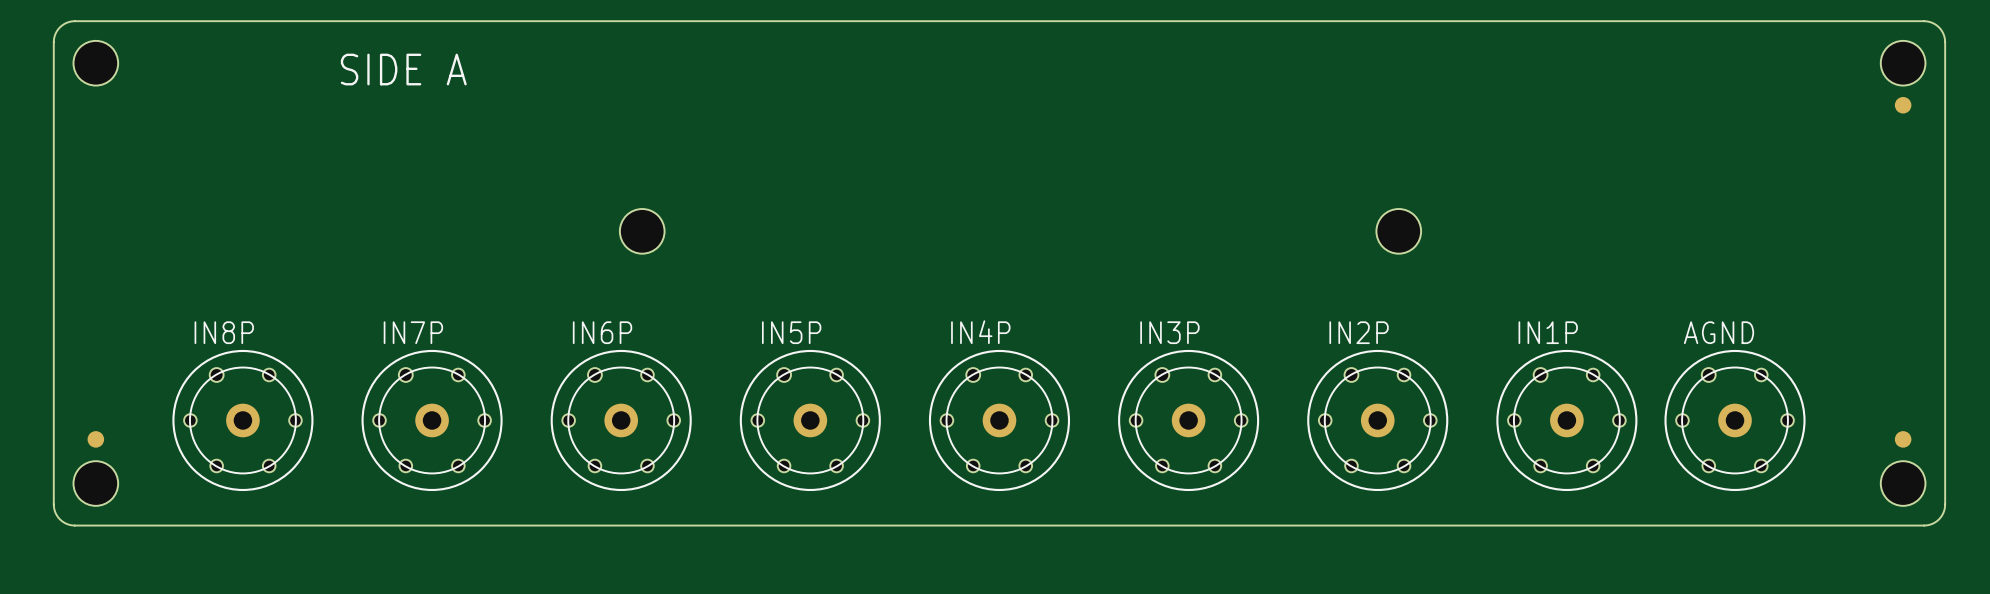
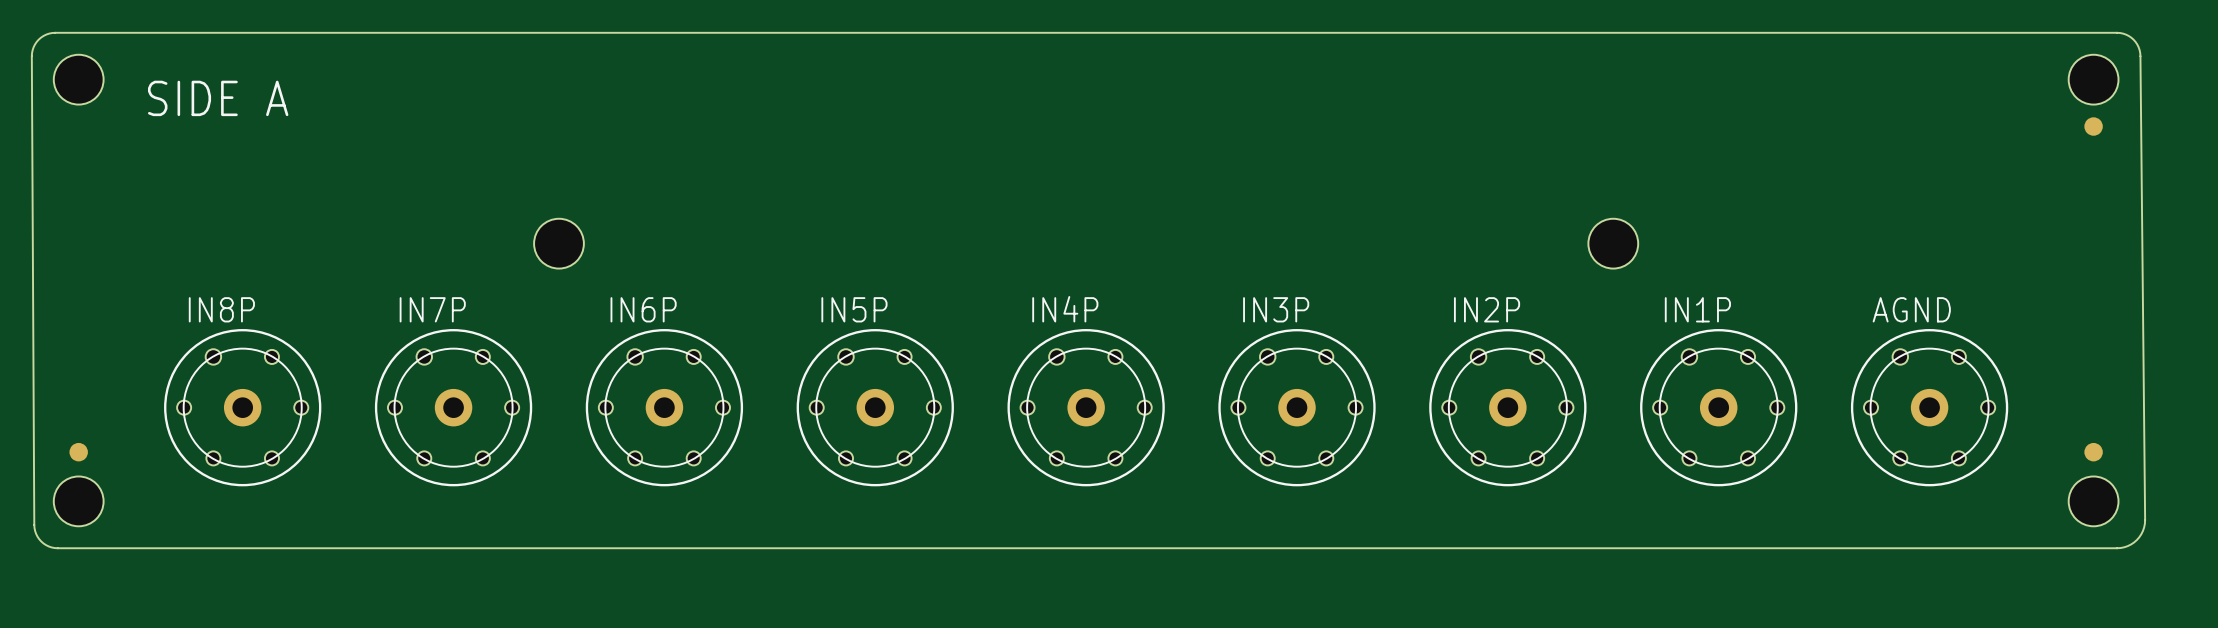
board edge: (1945, 42) (1945, 504) (1943, 512) (1939, 519) (1932, 523) (1924, 525) (69, 524) (58, 517) (53, 504) (53, 42) -> (2140, 56) (2145, 520) (2142, 530) (2136, 540) (2127, 546) (2117, 548) (51, 547) (39, 539) (34, 524) (31, 56)
text position: SIDE A (403, 69) -> SIDE A (218, 98)
hole position: (642, 231) -> (558, 243)
hole position: (1398, 231) -> (1613, 243)
IN8P position: (242, 420) -> (242, 407)
IN7P position: (432, 420) -> (453, 407)
IN6P position: (621, 420) -> (664, 407)
IN5P position: (810, 420) -> (875, 407)
IN4P position: (999, 420) -> (1086, 407)
IN3P position: (1188, 420) -> (1297, 407)
IN2P position: (1377, 420) -> (1507, 407)
IN1P position: (1566, 420) -> (1718, 407)
AGND position: (1735, 420) -> (1929, 407)
part position: (95, 439) -> (78, 452)
part position: (1903, 439) -> (2093, 452)
hole position: (95, 483) -> (78, 501)
hole position: (1903, 483) -> (2093, 501)

